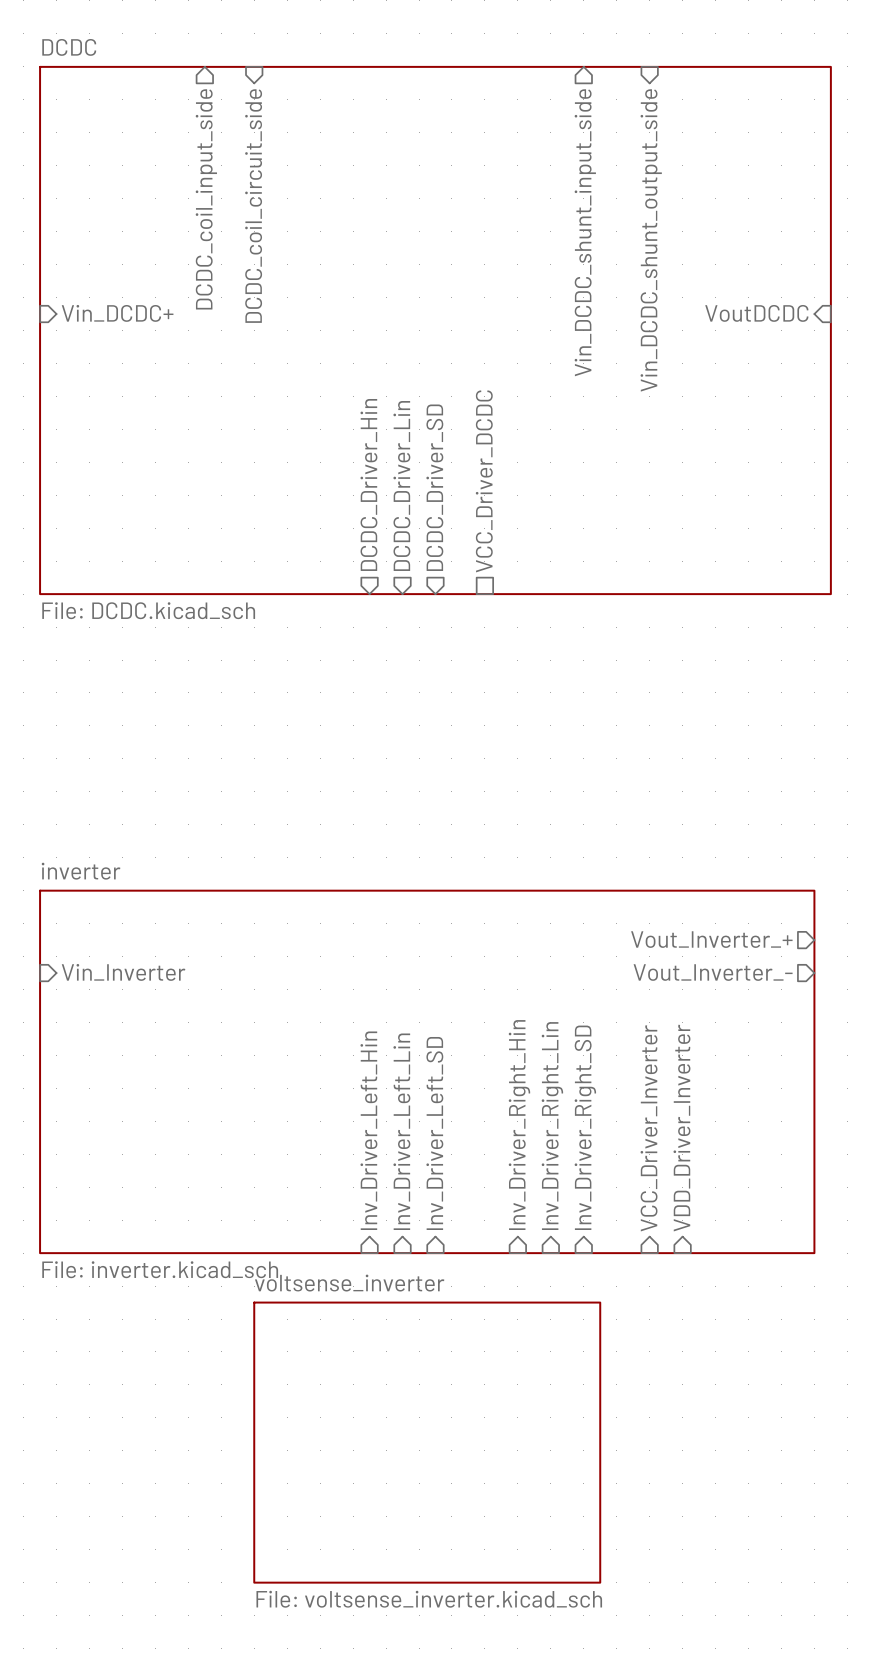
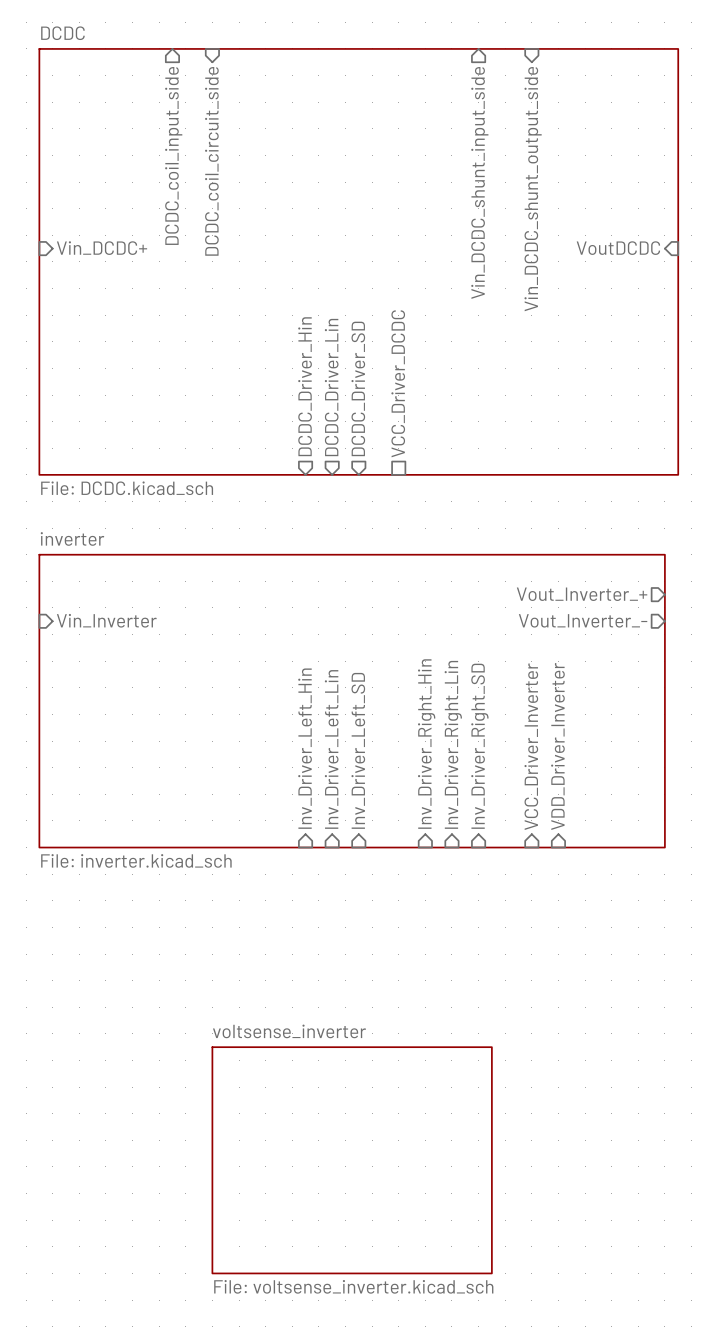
sheet pin position: Vout_Inverter_+ (711, 939) -> Vout_Inverter_+ (582, 594)
sheet pin position: Vin_Inverter (123, 972) -> Vin_Inverter (106, 620)
sheet pin position: Vout_Inverter_- (713, 972) -> Vout_Inverter_- (583, 620)
sheet inverter position: (427, 1071) -> (352, 701)
sheet pin position: Inv_Driver_Right_Hin (519, 1125) -> Inv_Driver_Right_Hin (426, 744)
sheet pin position: Inv_Driver_Right_Lin (552, 1126) -> Inv_Driver_Right_Lin (453, 744)
sheet pin position: Inv_Driver_Right_SD (585, 1127) -> Inv_Driver_Right_SD (479, 746)
sheet pin position: VCC_Driver_Inverter (649, 1128) -> VCC_Driver_Inverter (531, 746)
sheet pin position: VDD_Driver_Inverter (681, 1128) -> VDD_Driver_Inverter (557, 746)
sheet pin position: Inv_Driver_Left_Hin (368, 1130) -> Inv_Driver_Left_Hin (305, 748)
sheet pin position: Inv_Driver_Left_Lin (401, 1131) -> Inv_Driver_Left_Lin (331, 749)
sheet pin position: Inv_Driver_Left_SD (434, 1133) -> Inv_Driver_Left_SD (358, 750)

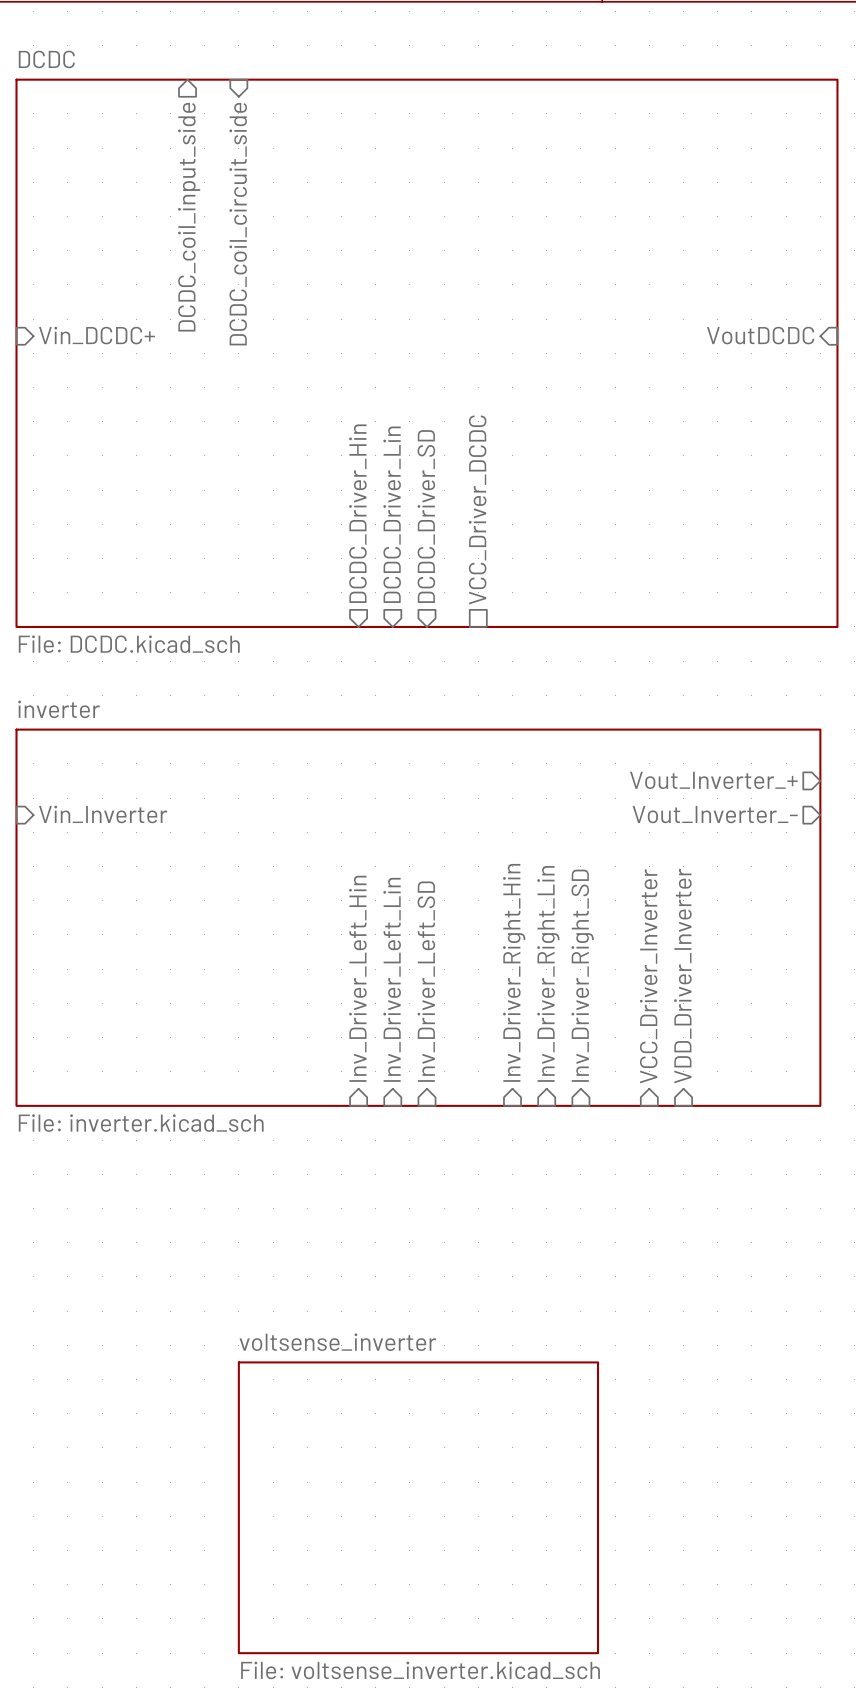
sheet pin: Vin_DCDC_shunt_input_side (479, 182) -> none
sheet pin: Vin_DCDC_shunt_output_side (533, 189) -> none

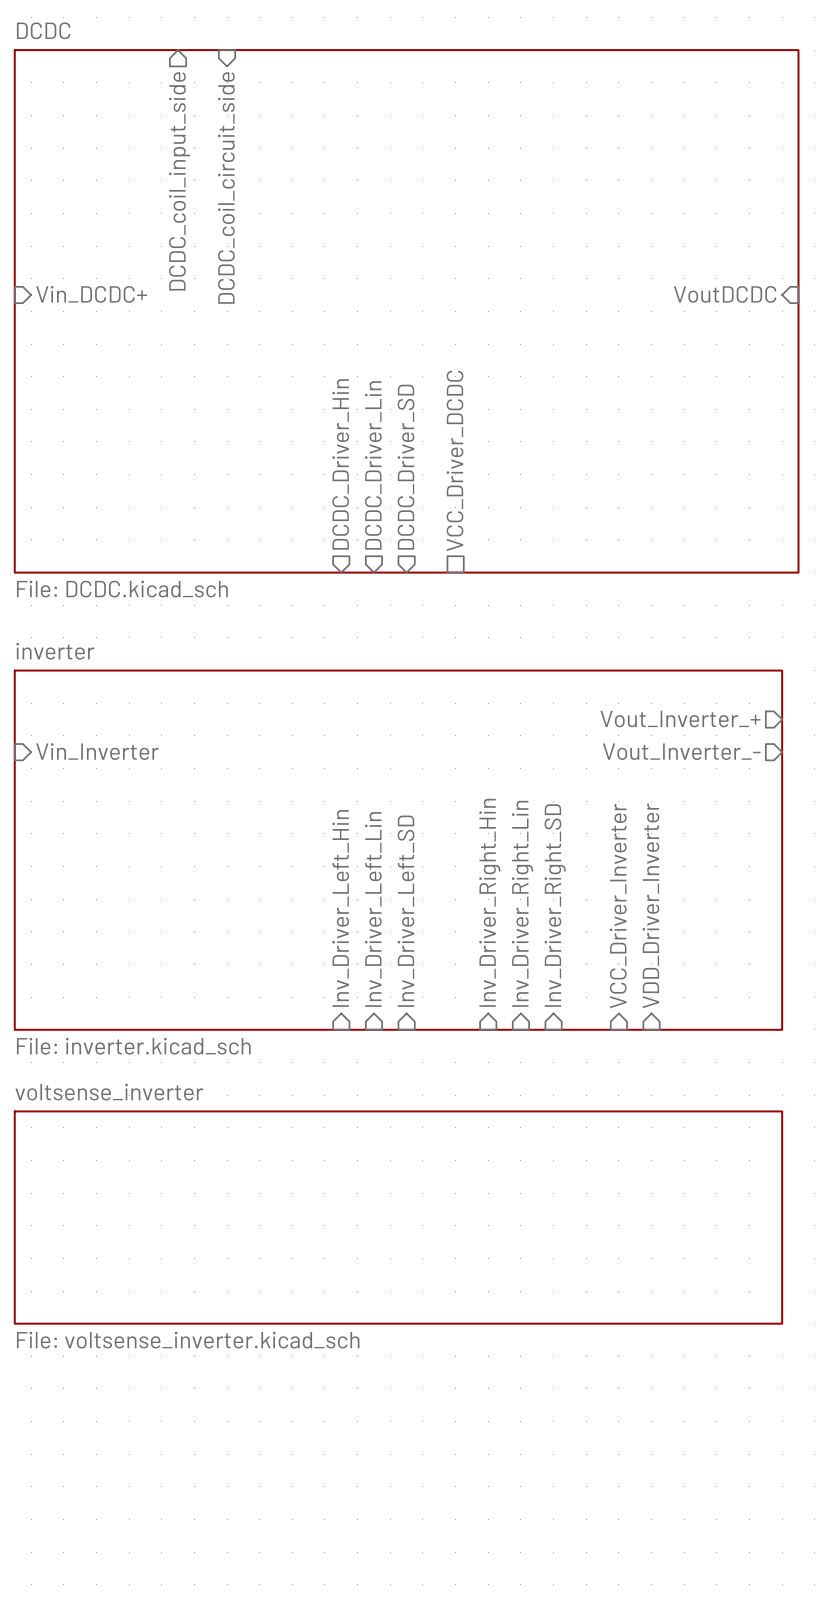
sheet voltsense_inverter: none -> File: voltsense_inverter.kicad_sch (398, 1217)
sheet voltsense_inverter: File: voltsense_inverter.kicad_sch (418, 1507) -> none

